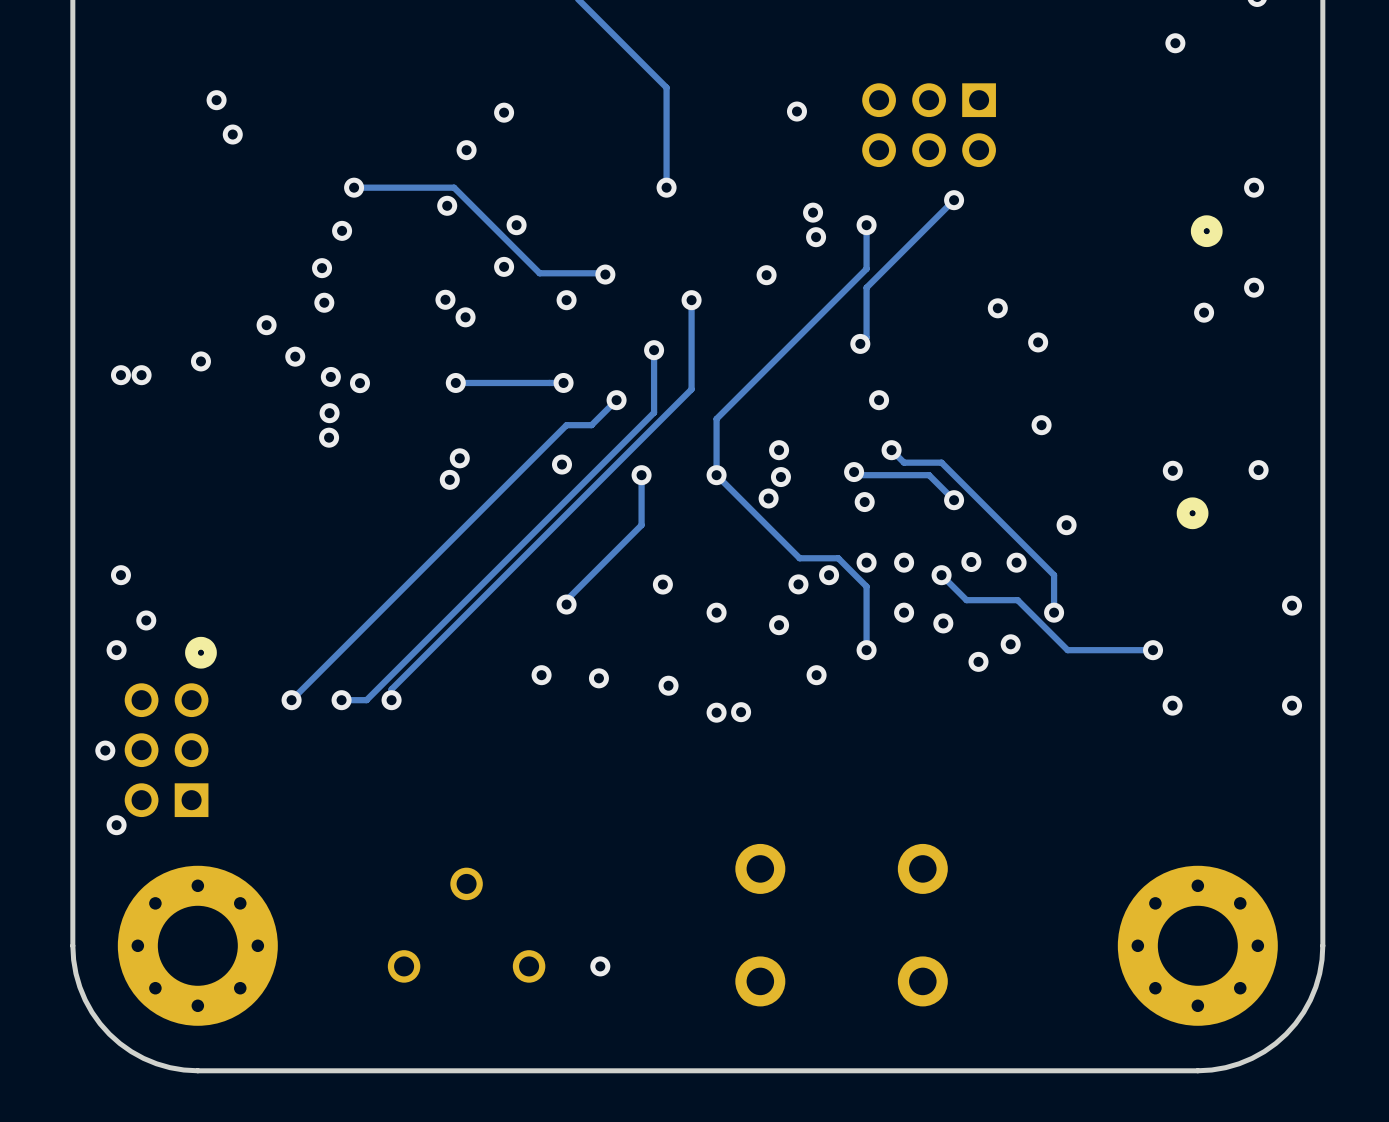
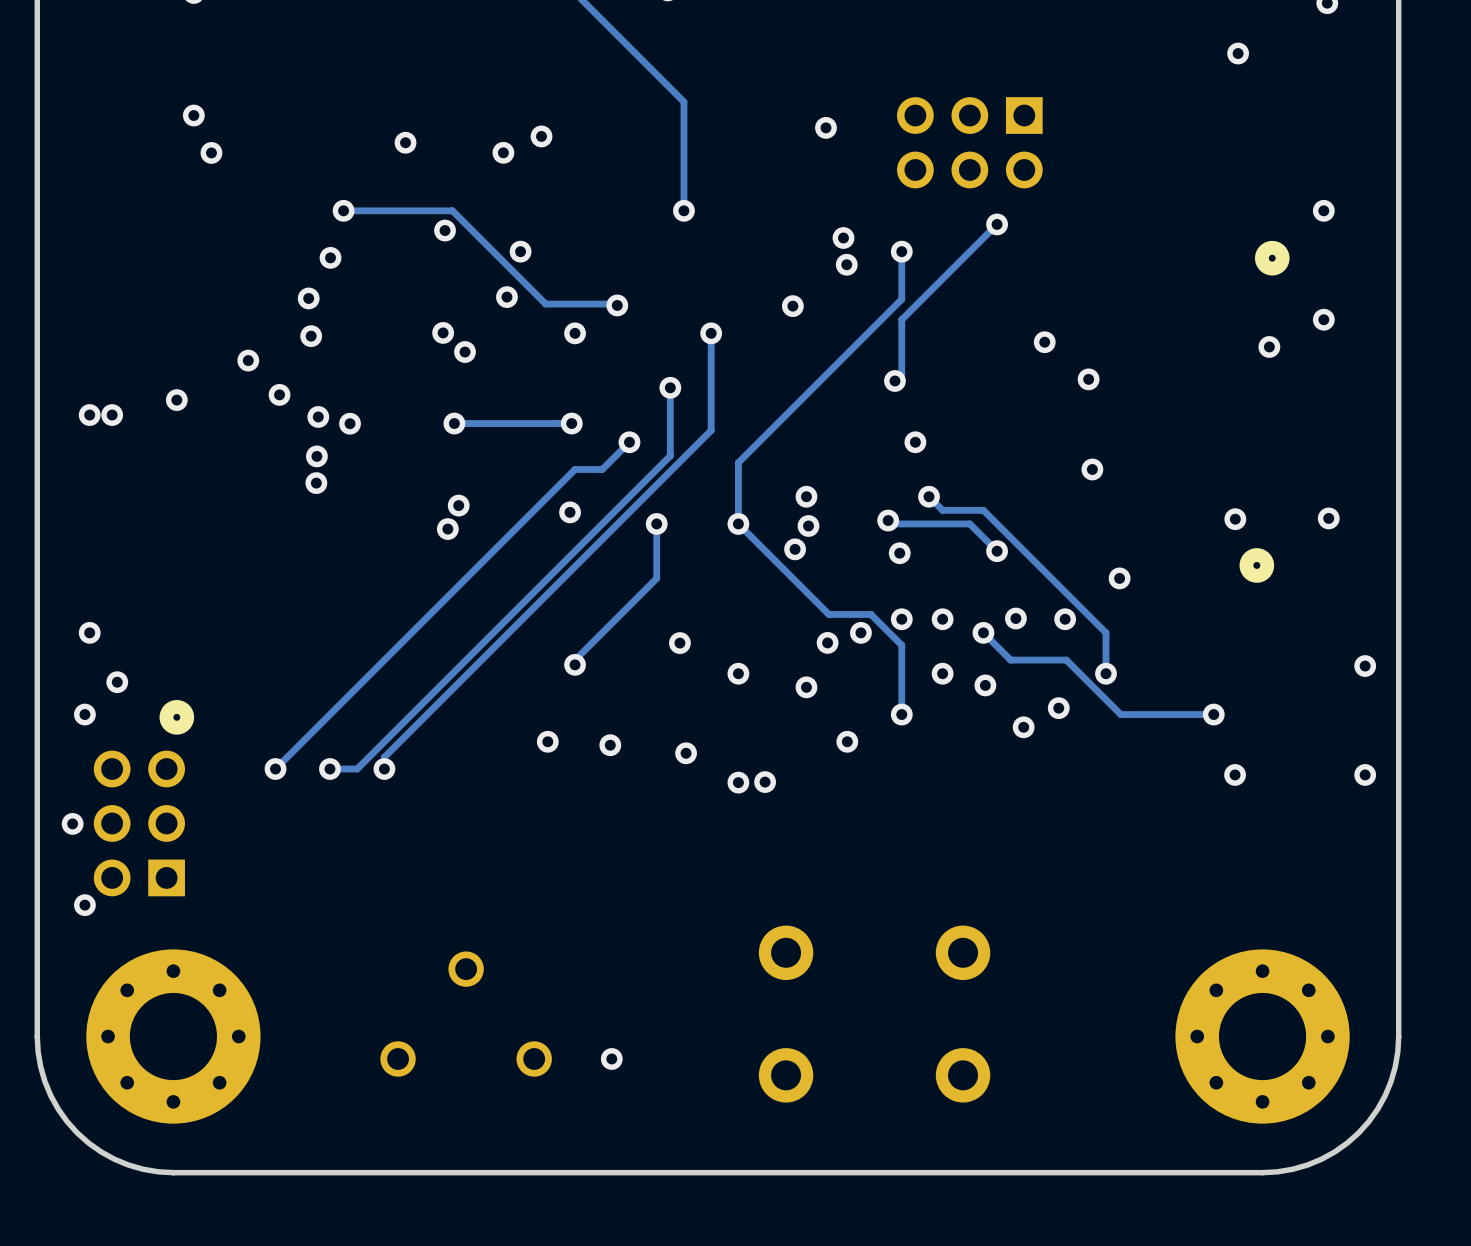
via: (504, 112) -> none
via: none -> (541, 136)
via: none -> (405, 142)
via: none -> (503, 152)
via: (466, 150) -> none

